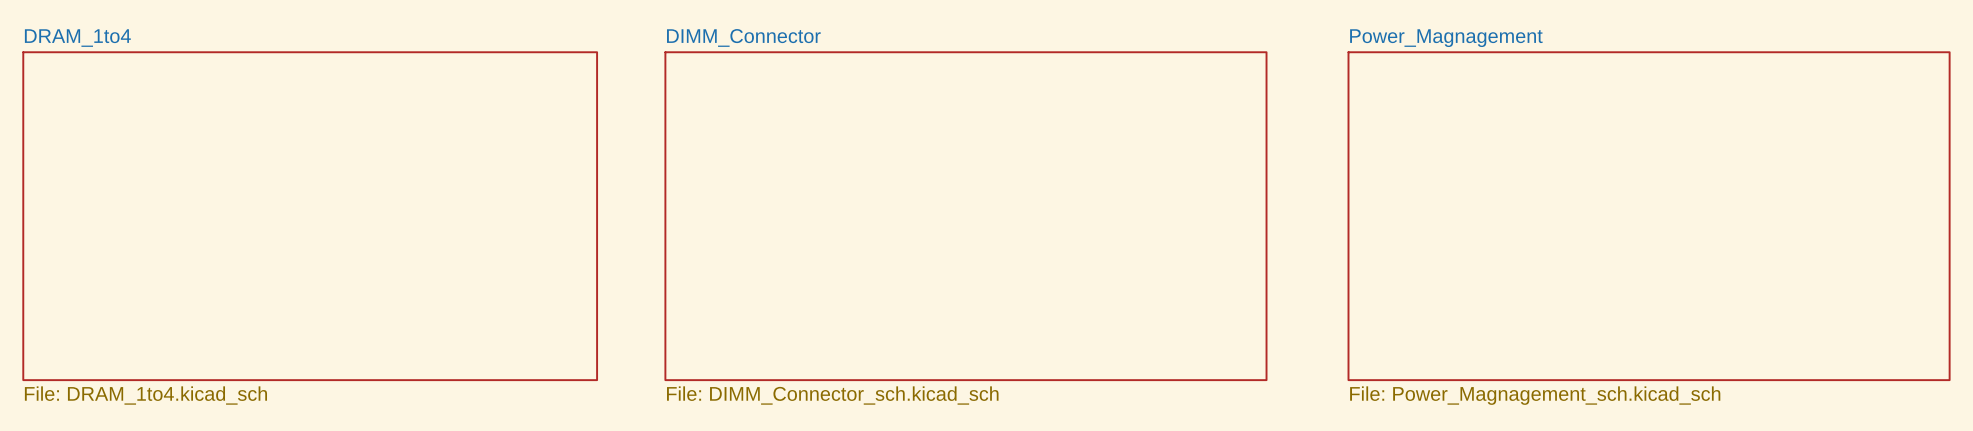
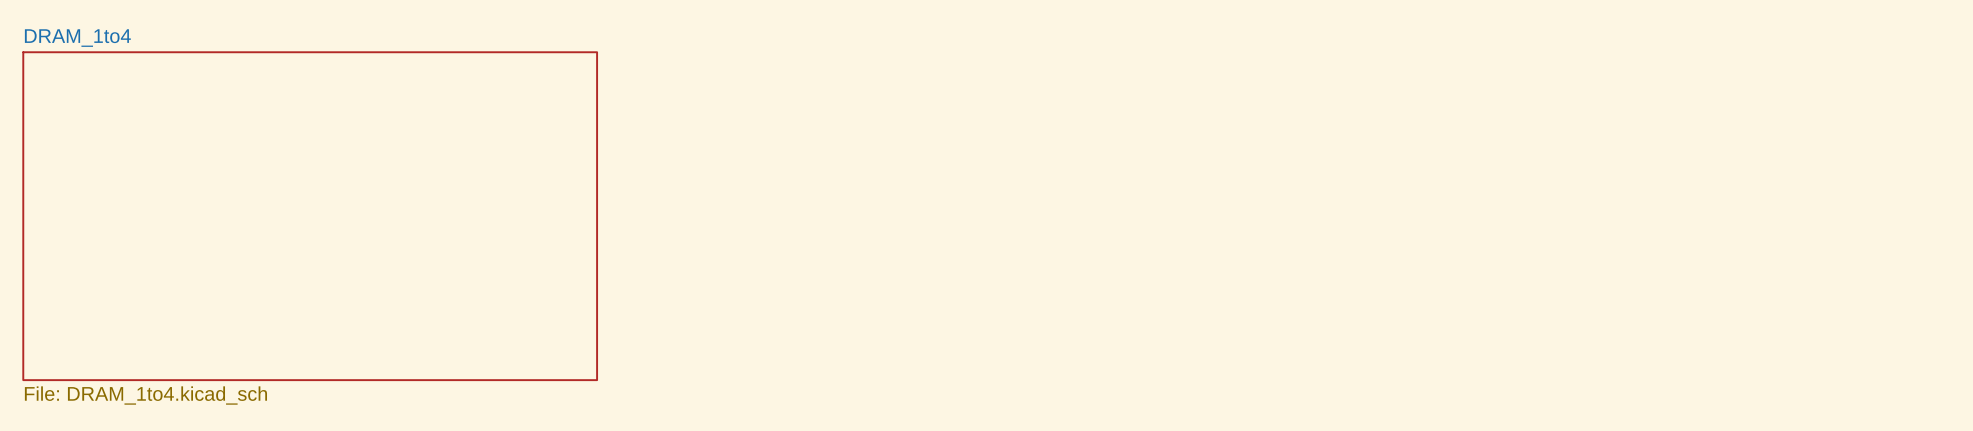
sheet DIMM_Connector: File: DIMM_Connector_sch.kicad_sch (965, 216) -> none
sheet Power_Magnagement: File: Power_Magnagement_sch.kicad_sch (1649, 216) -> none

